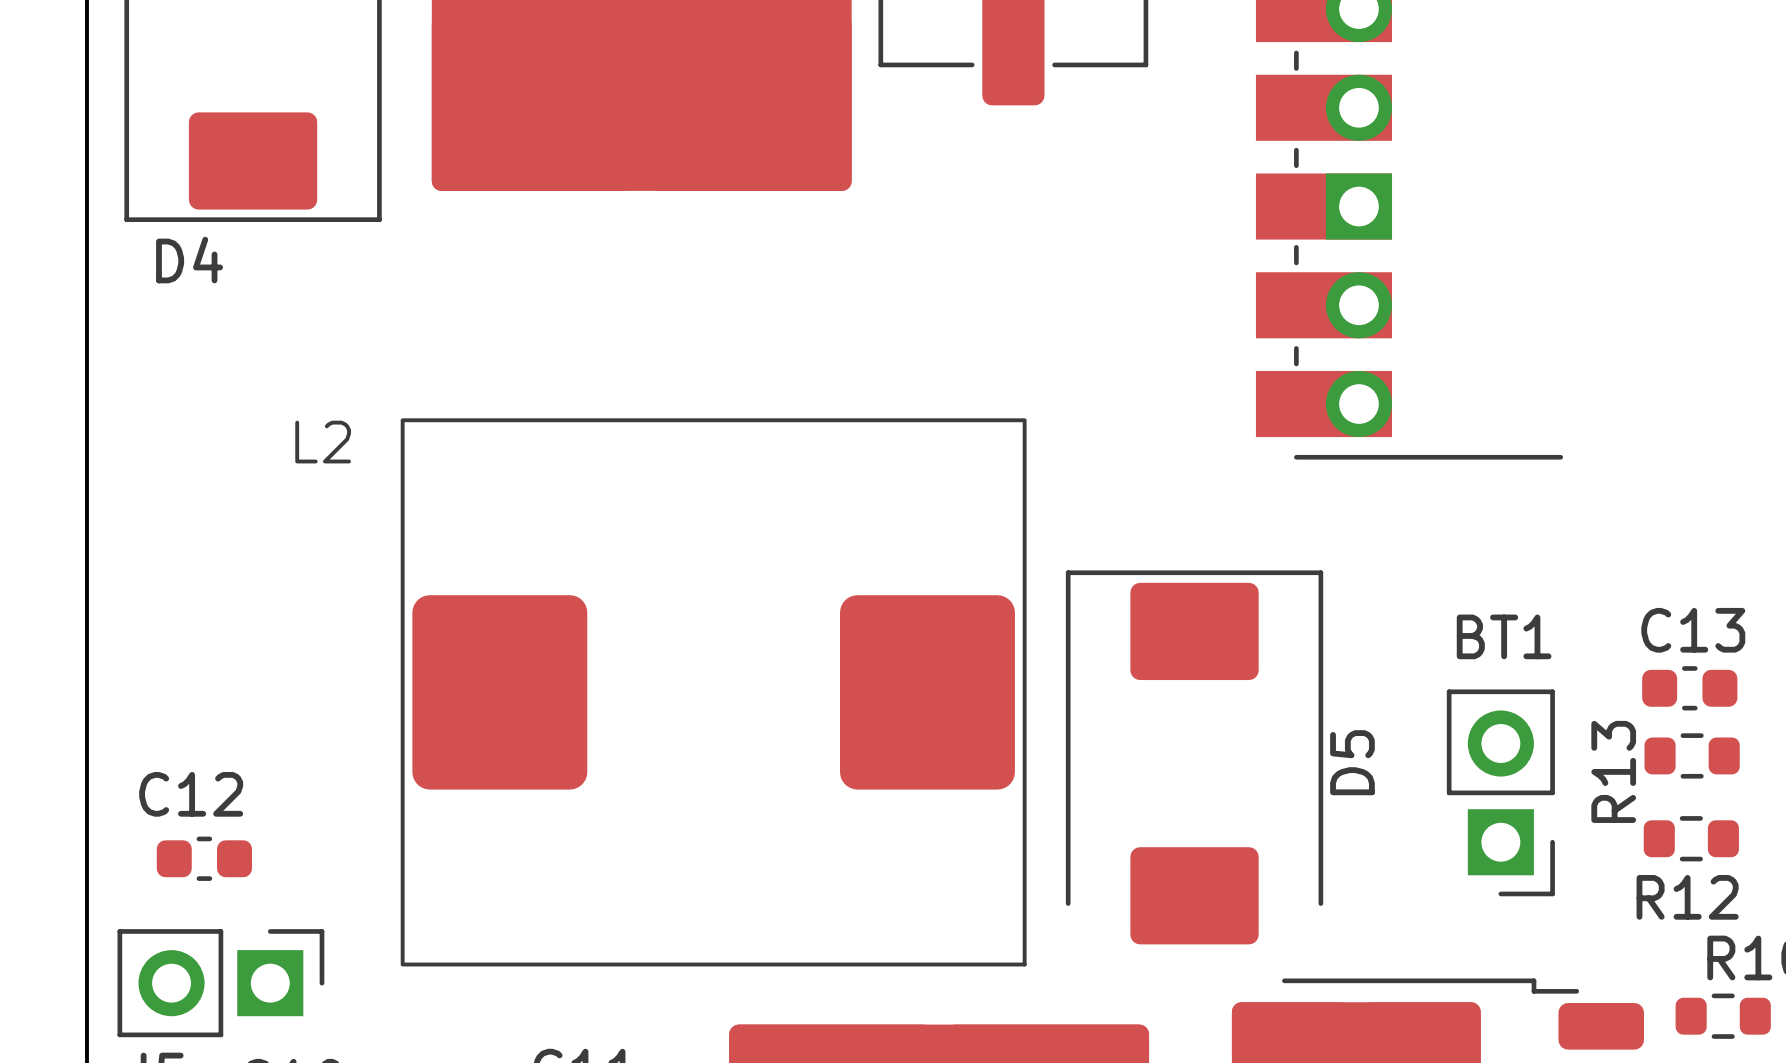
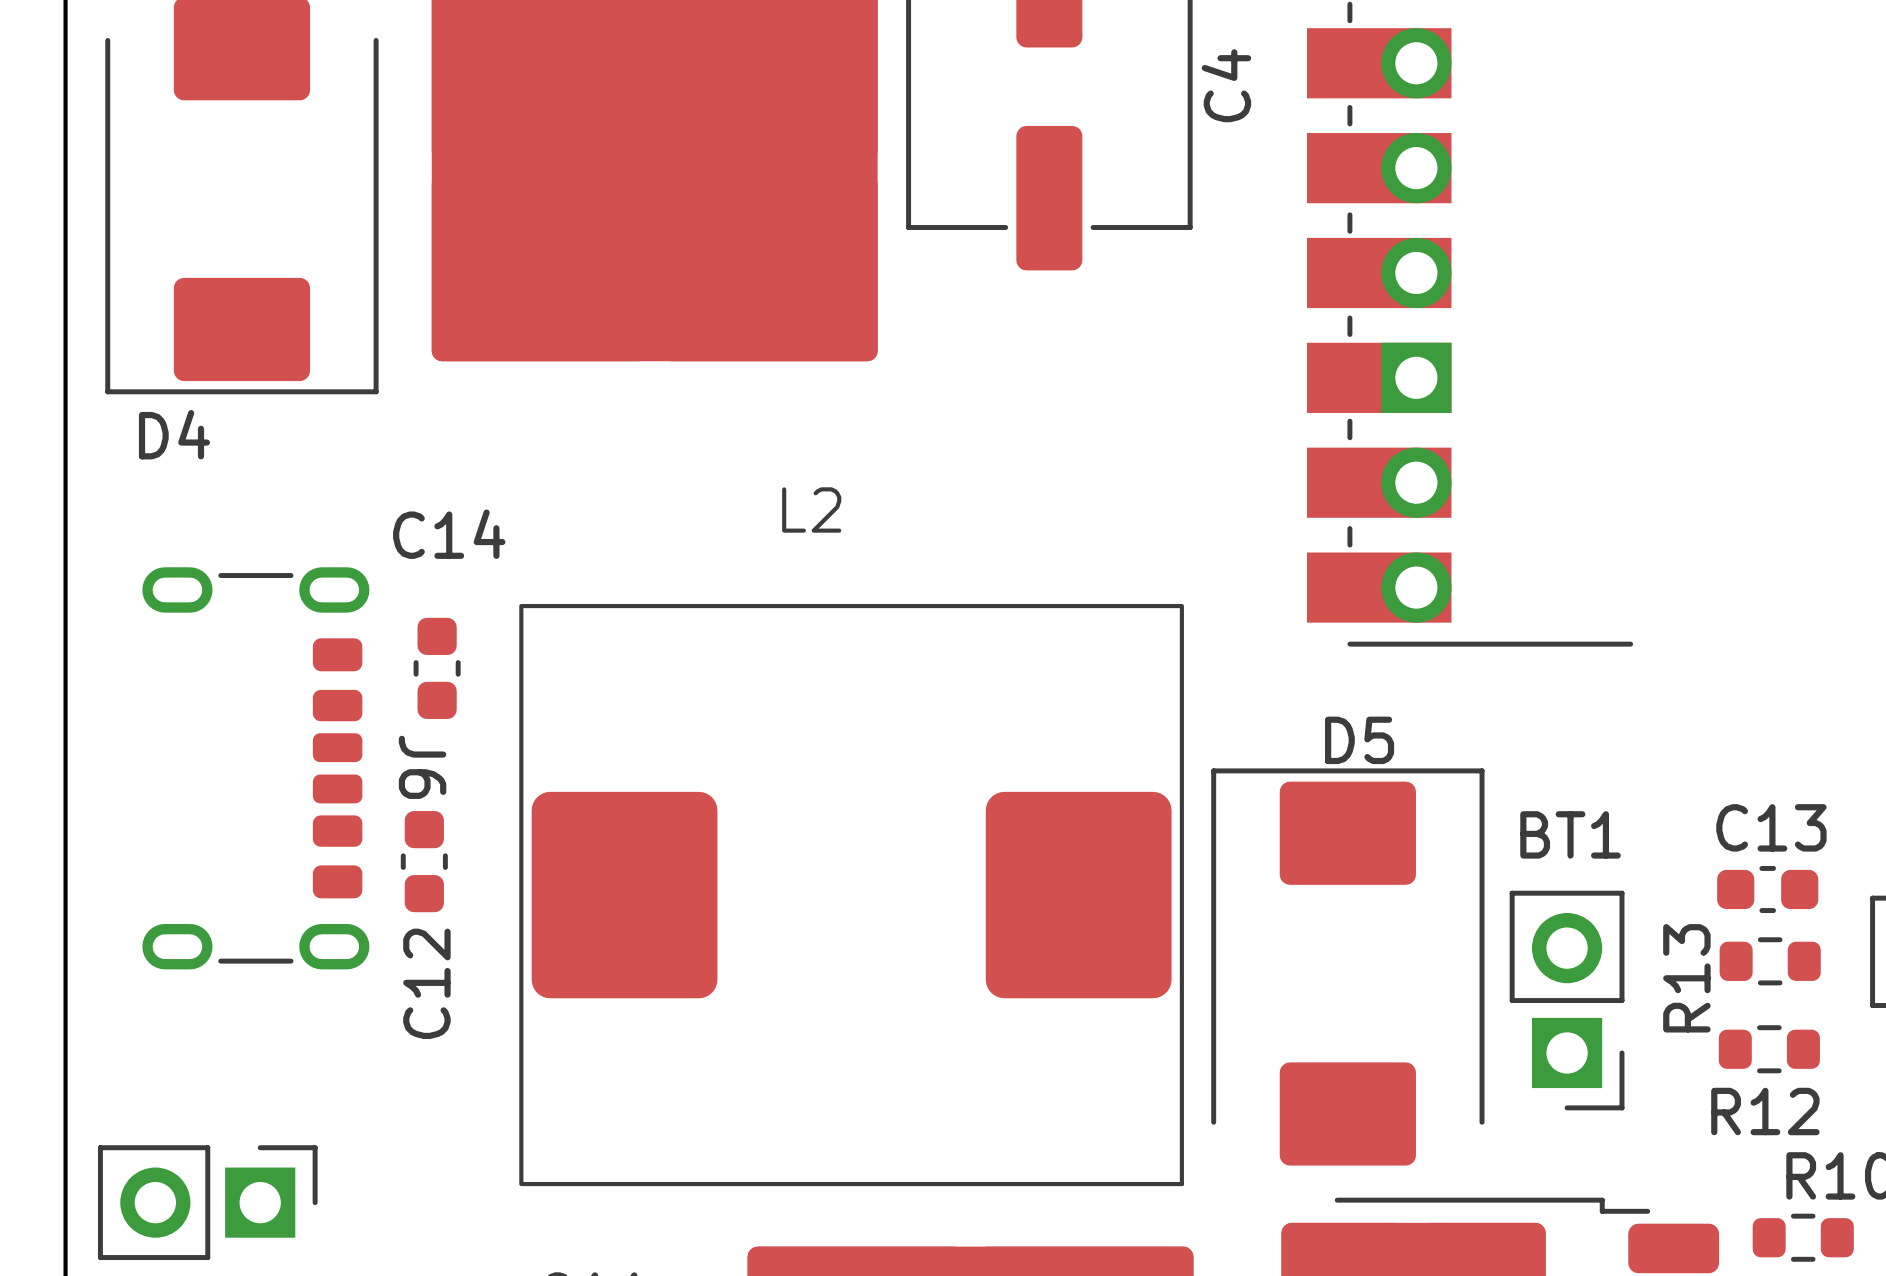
L2 name position: L2 (323, 442) -> L2 (811, 509)
C14: none -> (437, 668)
J6: none -> (255, 768)
L2 position: (713, 692) -> (851, 895)
D5 position: (1194, 757) -> (1347, 967)
D5 name rotation: 0° (1352, 762) -> 90° clockwise (1359, 740)
D5 name position: D5 (1352, 762) -> D5 (1359, 740)
C12 name position: C12 (191, 794) -> C12 (426, 983)
C12 rotation: 0° (204, 858) -> 90° clockwise (424, 861)
C12 position: (204, 858) -> (424, 861)

